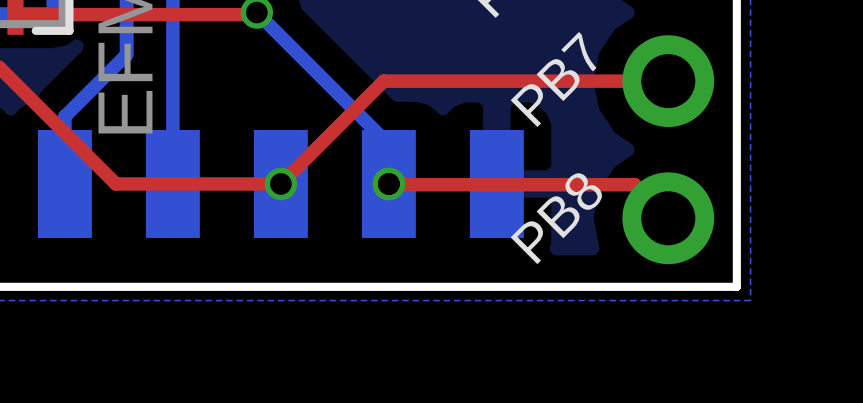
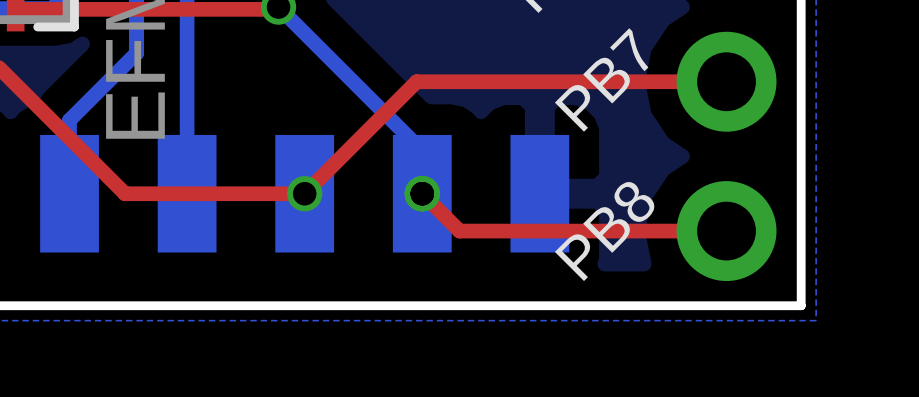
top track: (389, 184) (634, 184) (668, 218) -> (423, 194) (459, 231) (726, 231)

